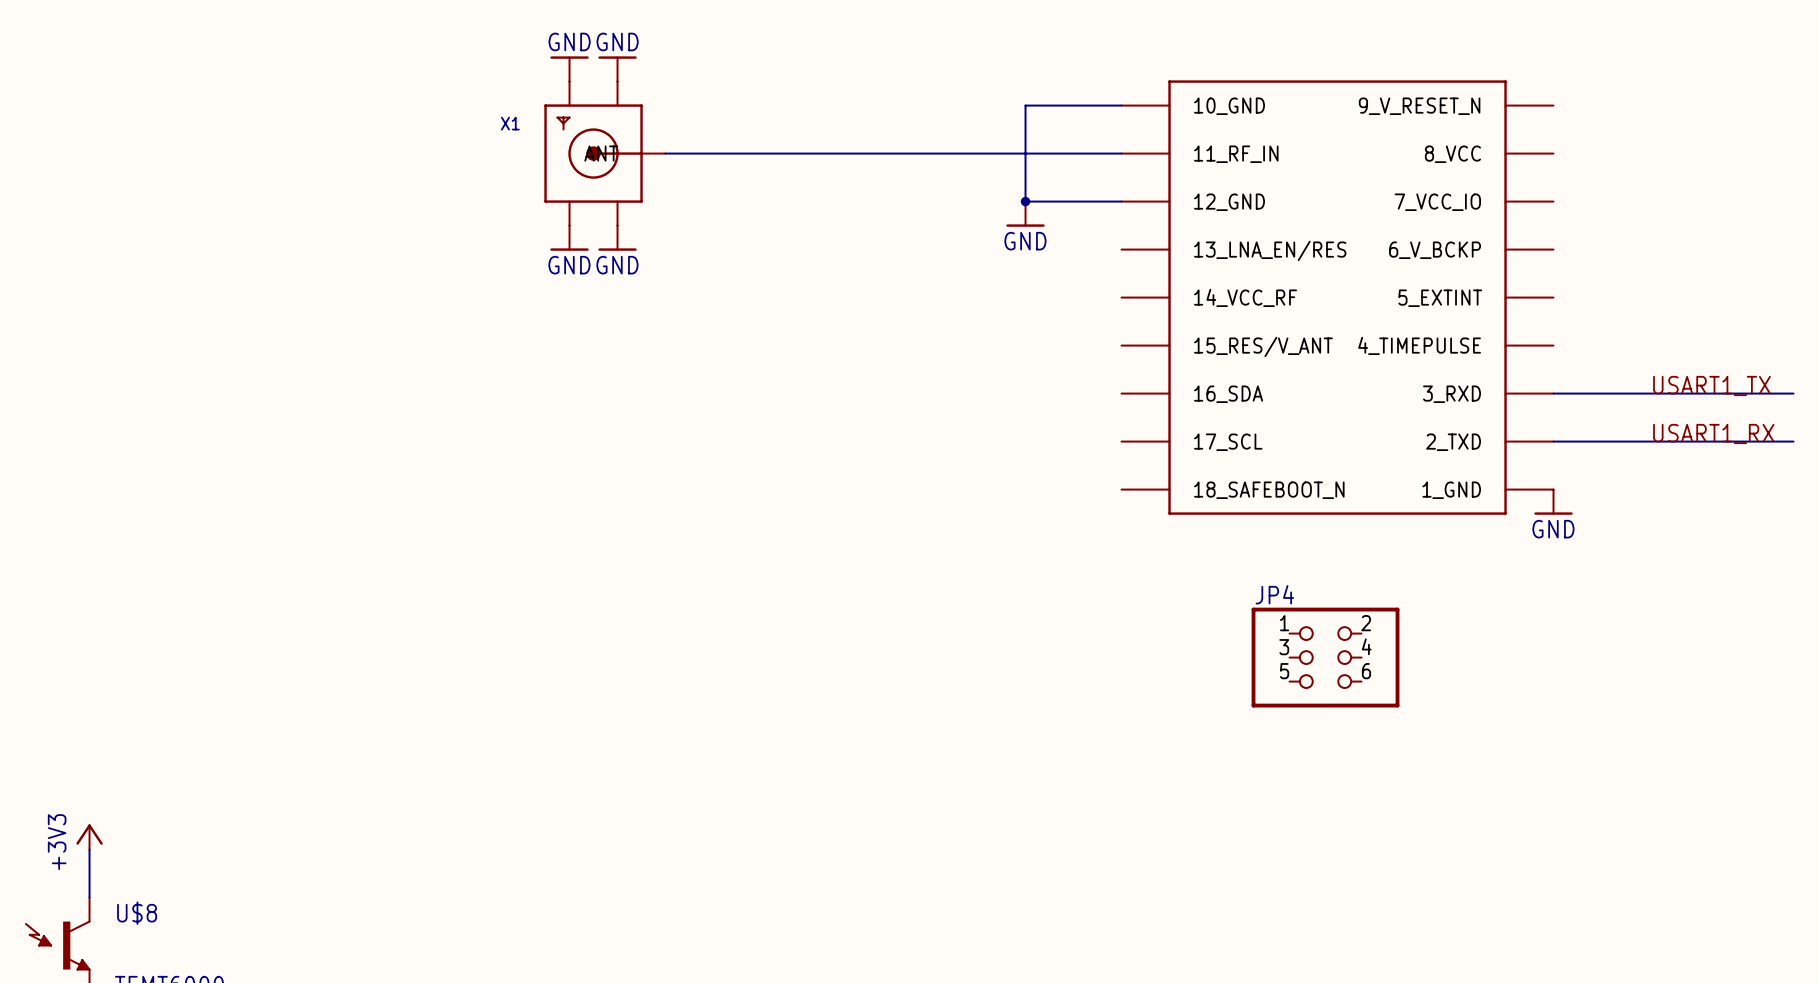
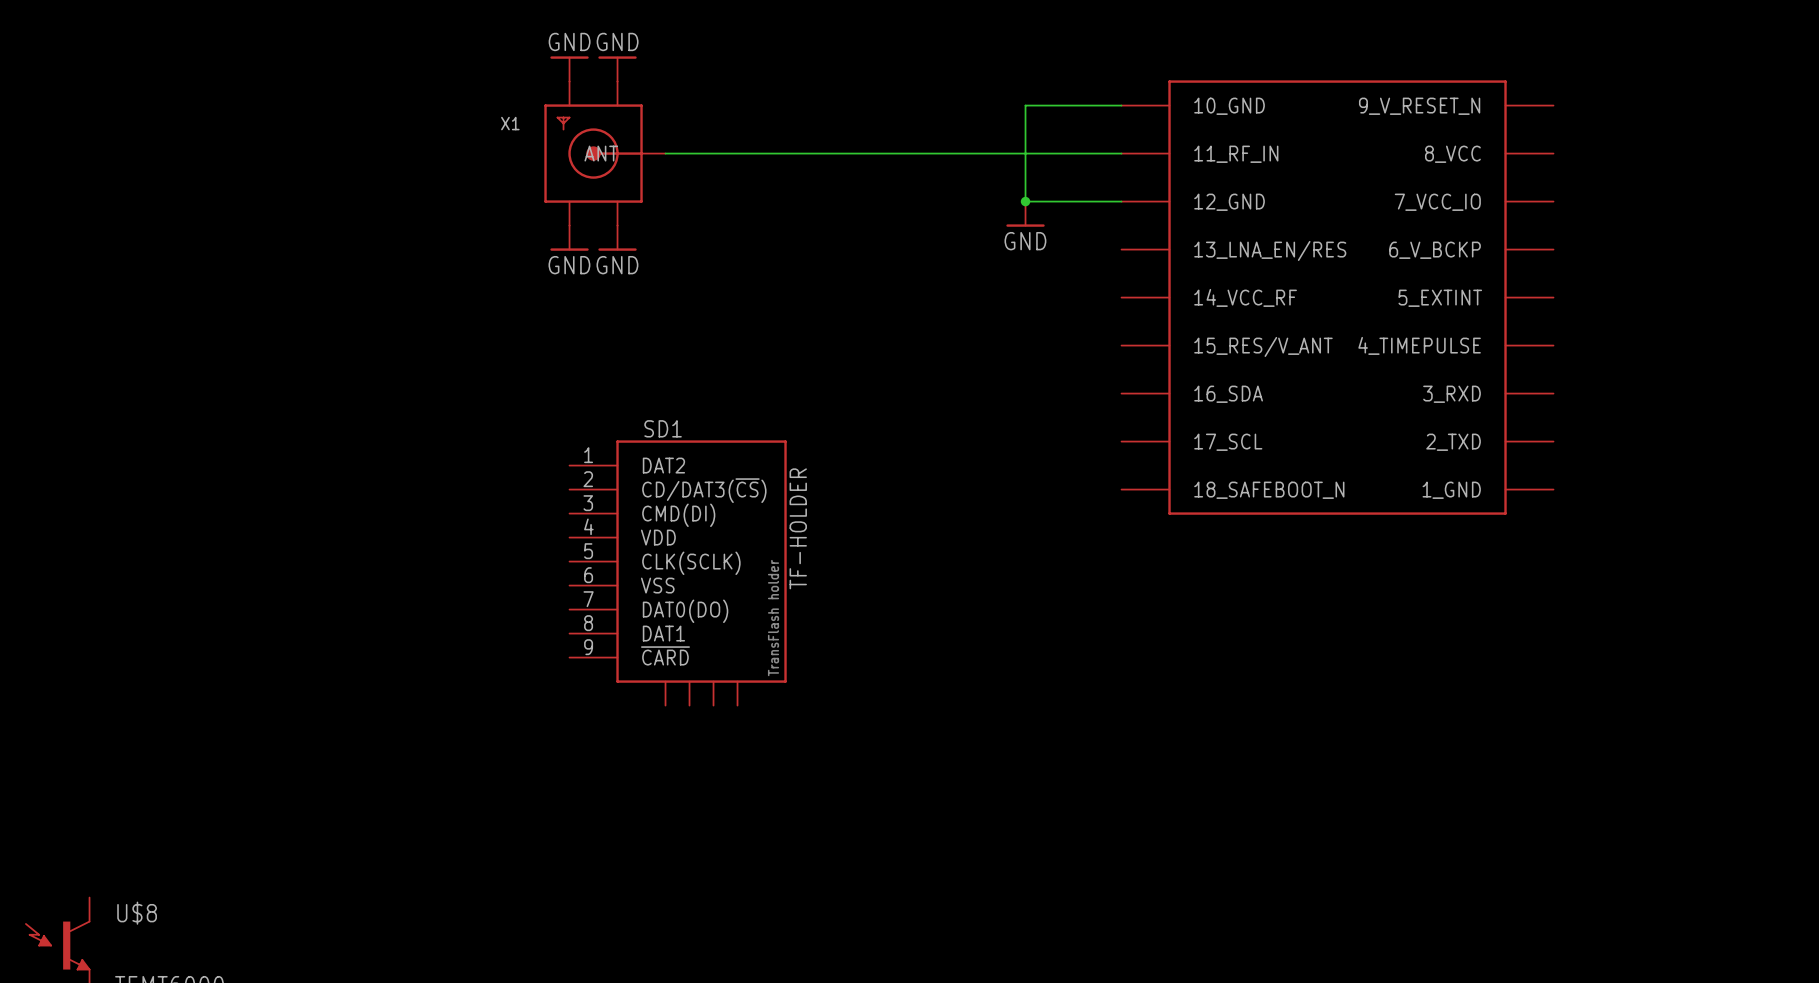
label: USART1_TX (1711, 385) -> none
wire: (1553, 393) (1793, 393) -> none
label: USART1_RX (1713, 433) -> none
wire: (1553, 441) (1793, 441) -> none
power symbol: GND (1553, 502) -> none
SD1: none -> TF-HOLDER (678, 572)
JP4: (1325, 657) -> none
power symbol: +3V3 (89, 836) -> none
wire: (89, 849) (89, 897) -> none

